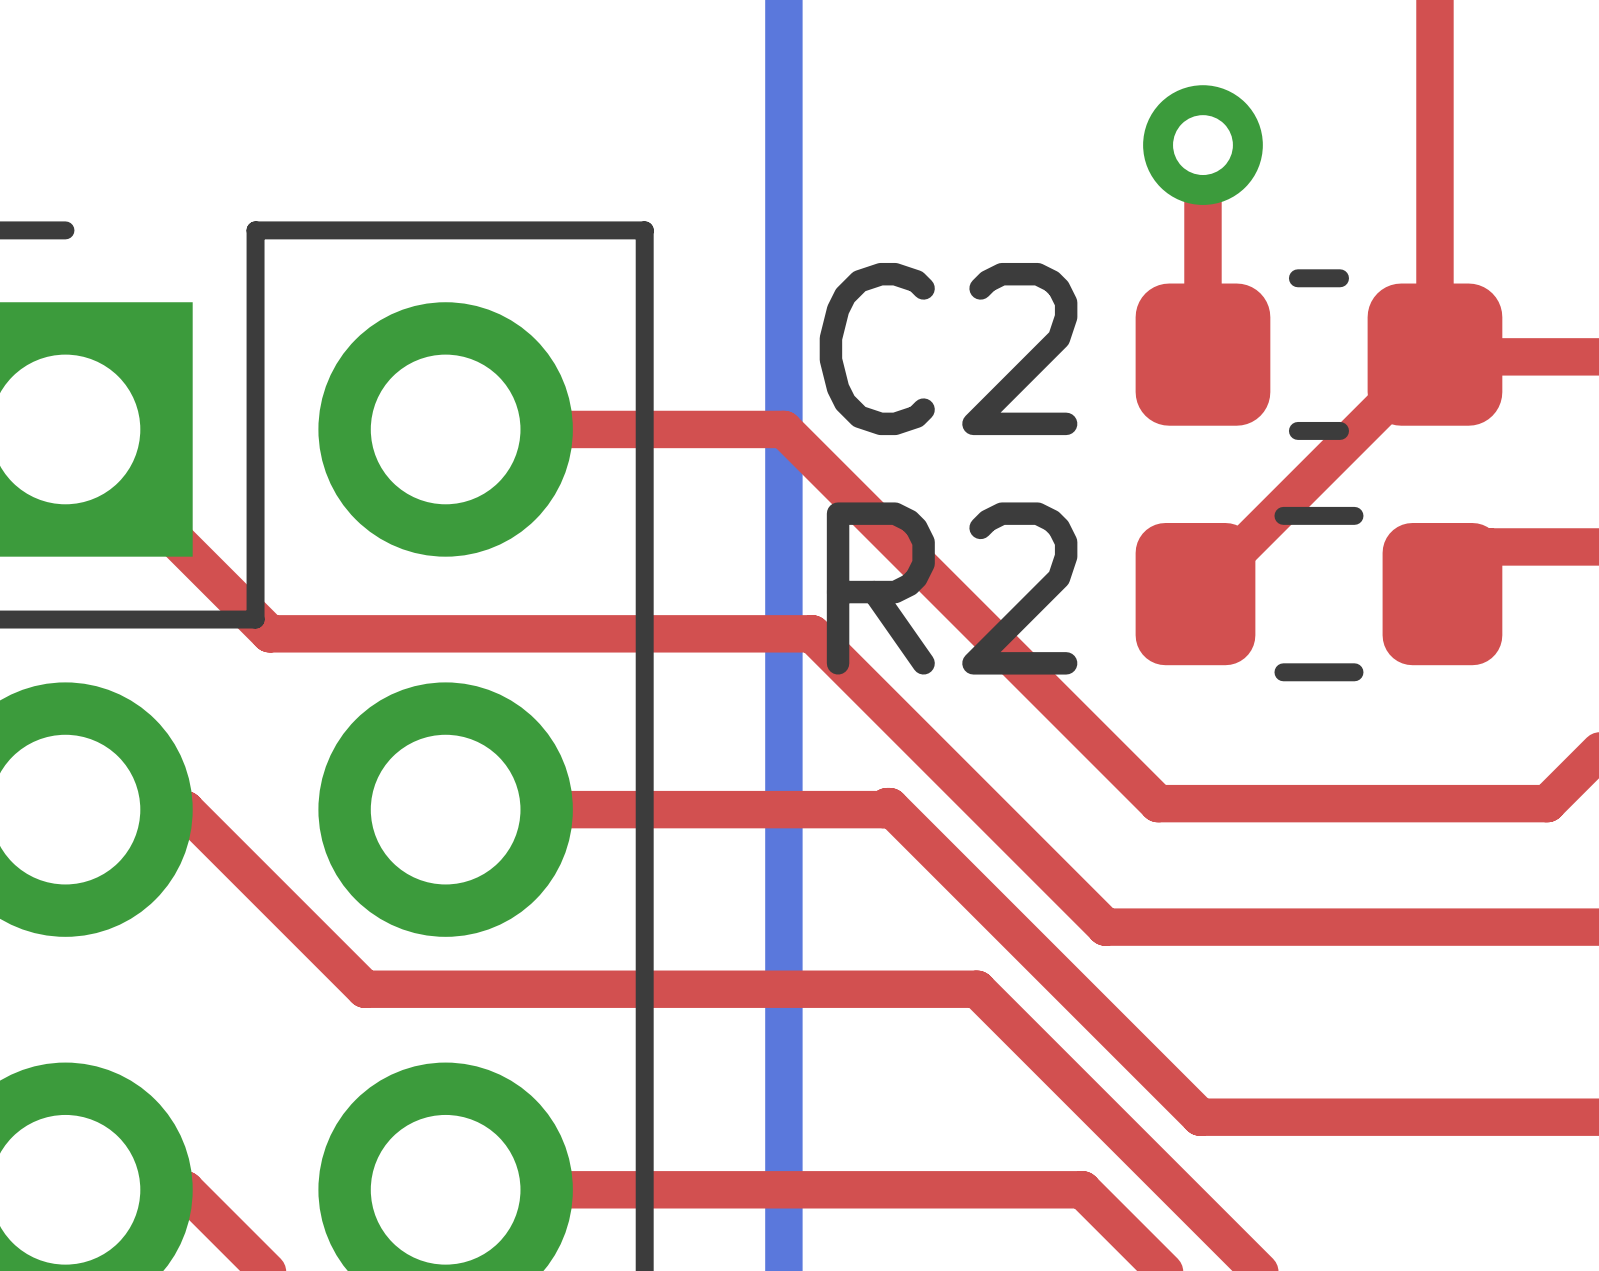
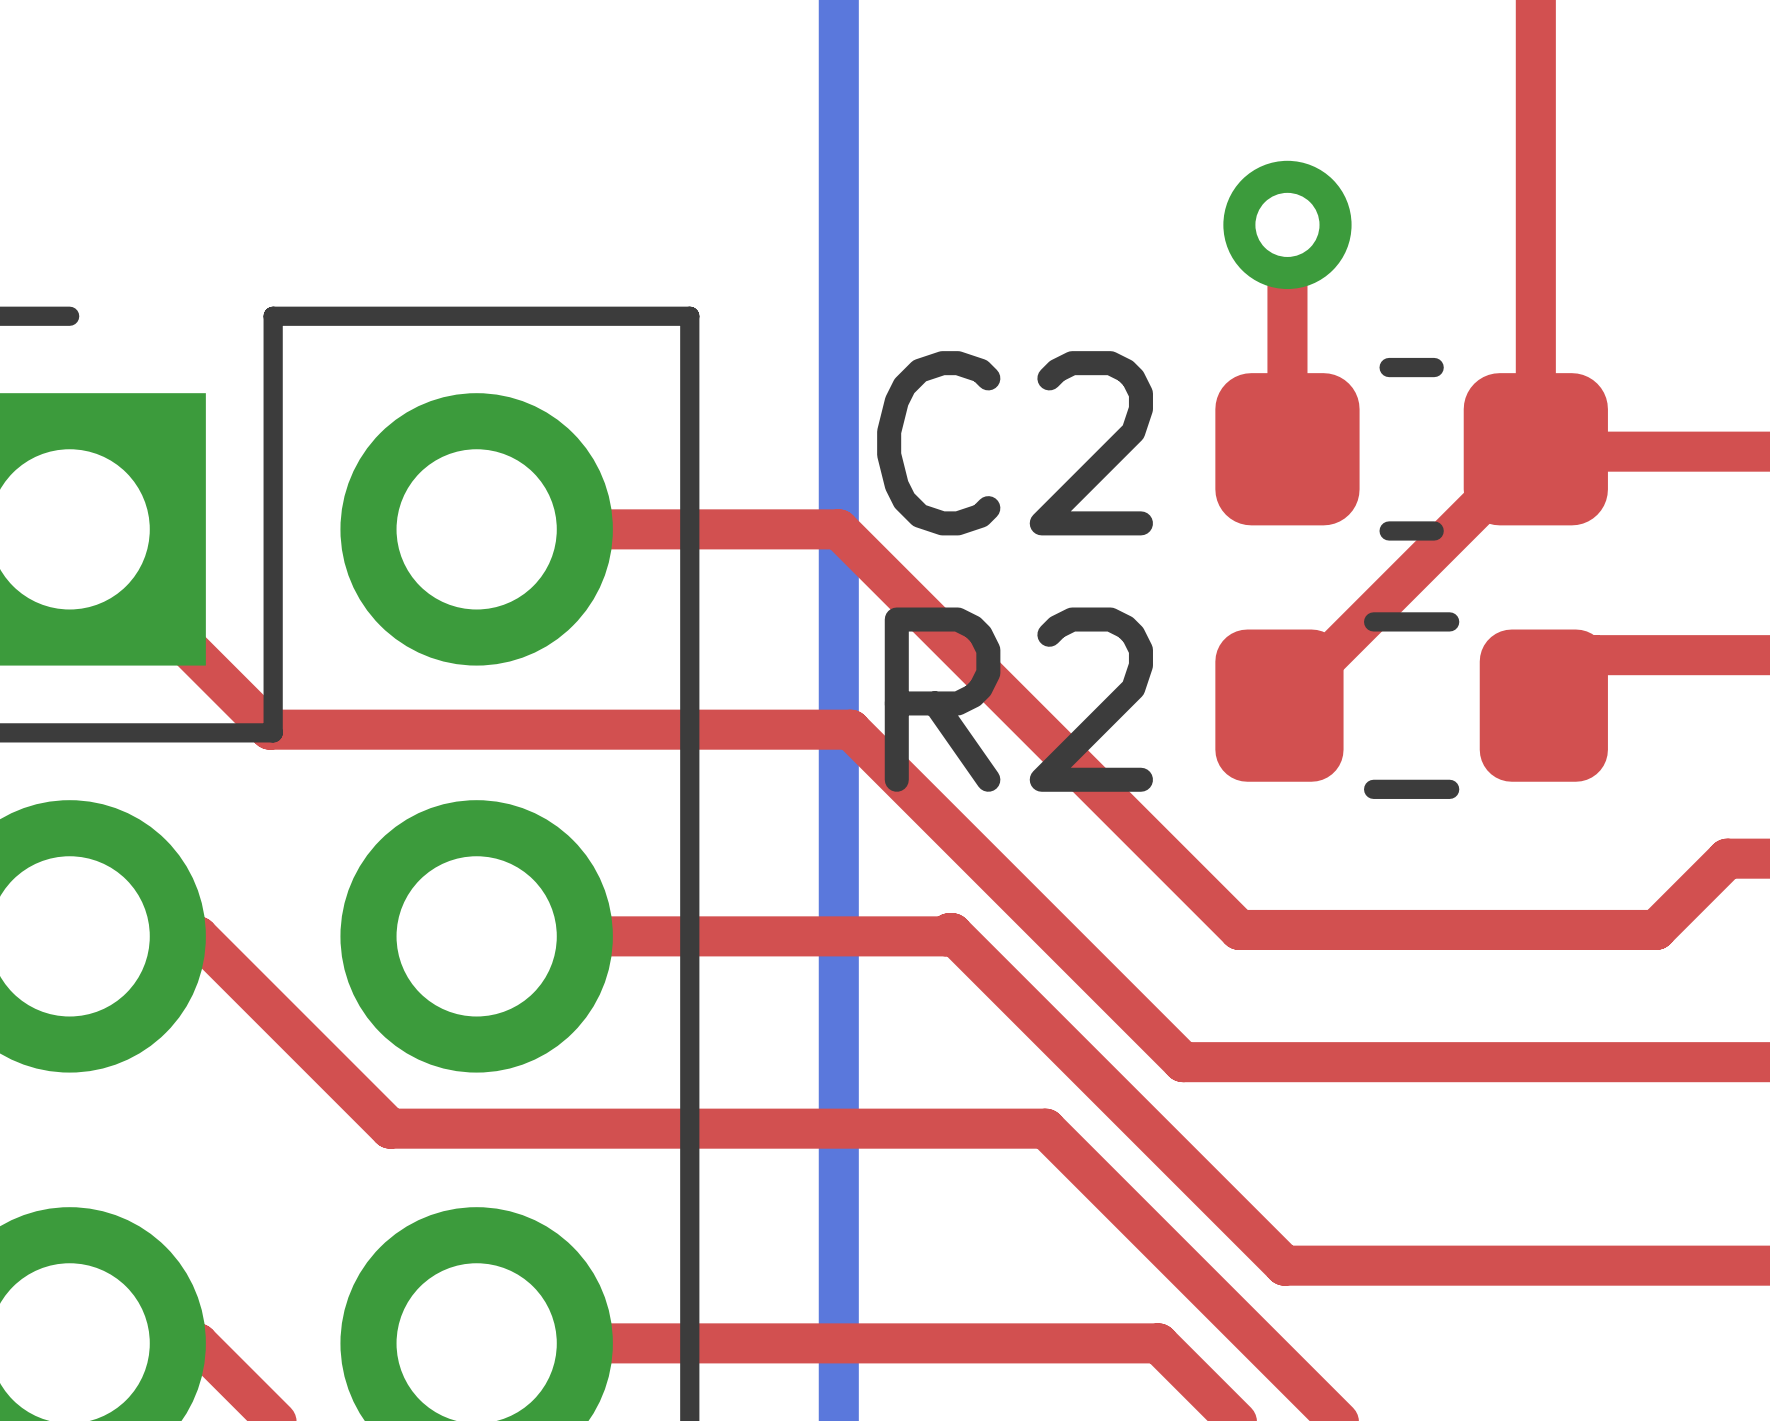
top track: (252, 616) (269, 633) (812, 633) -> (269, 729) (850, 729) (869, 748)

